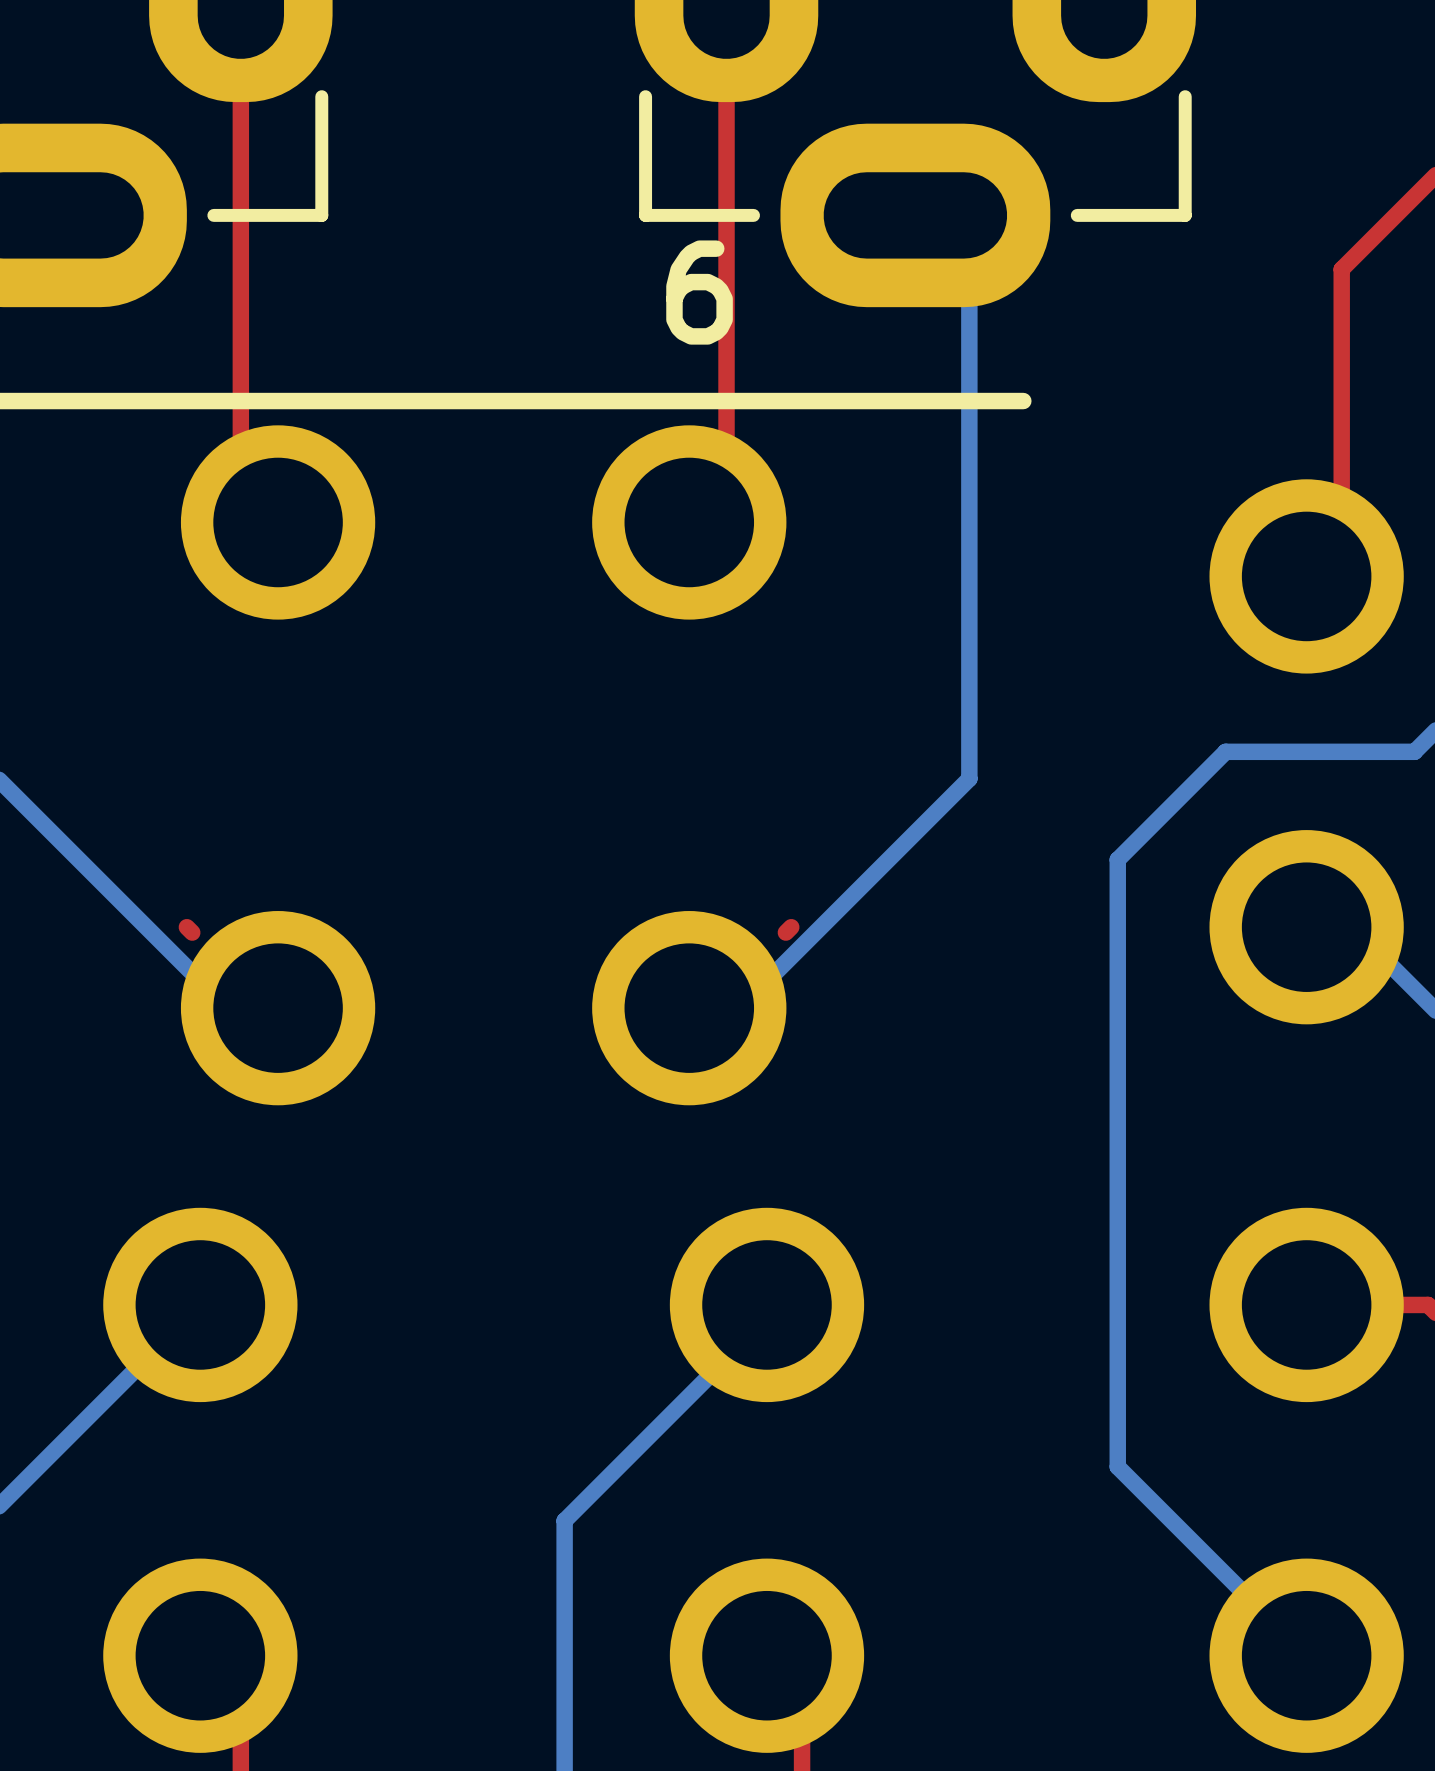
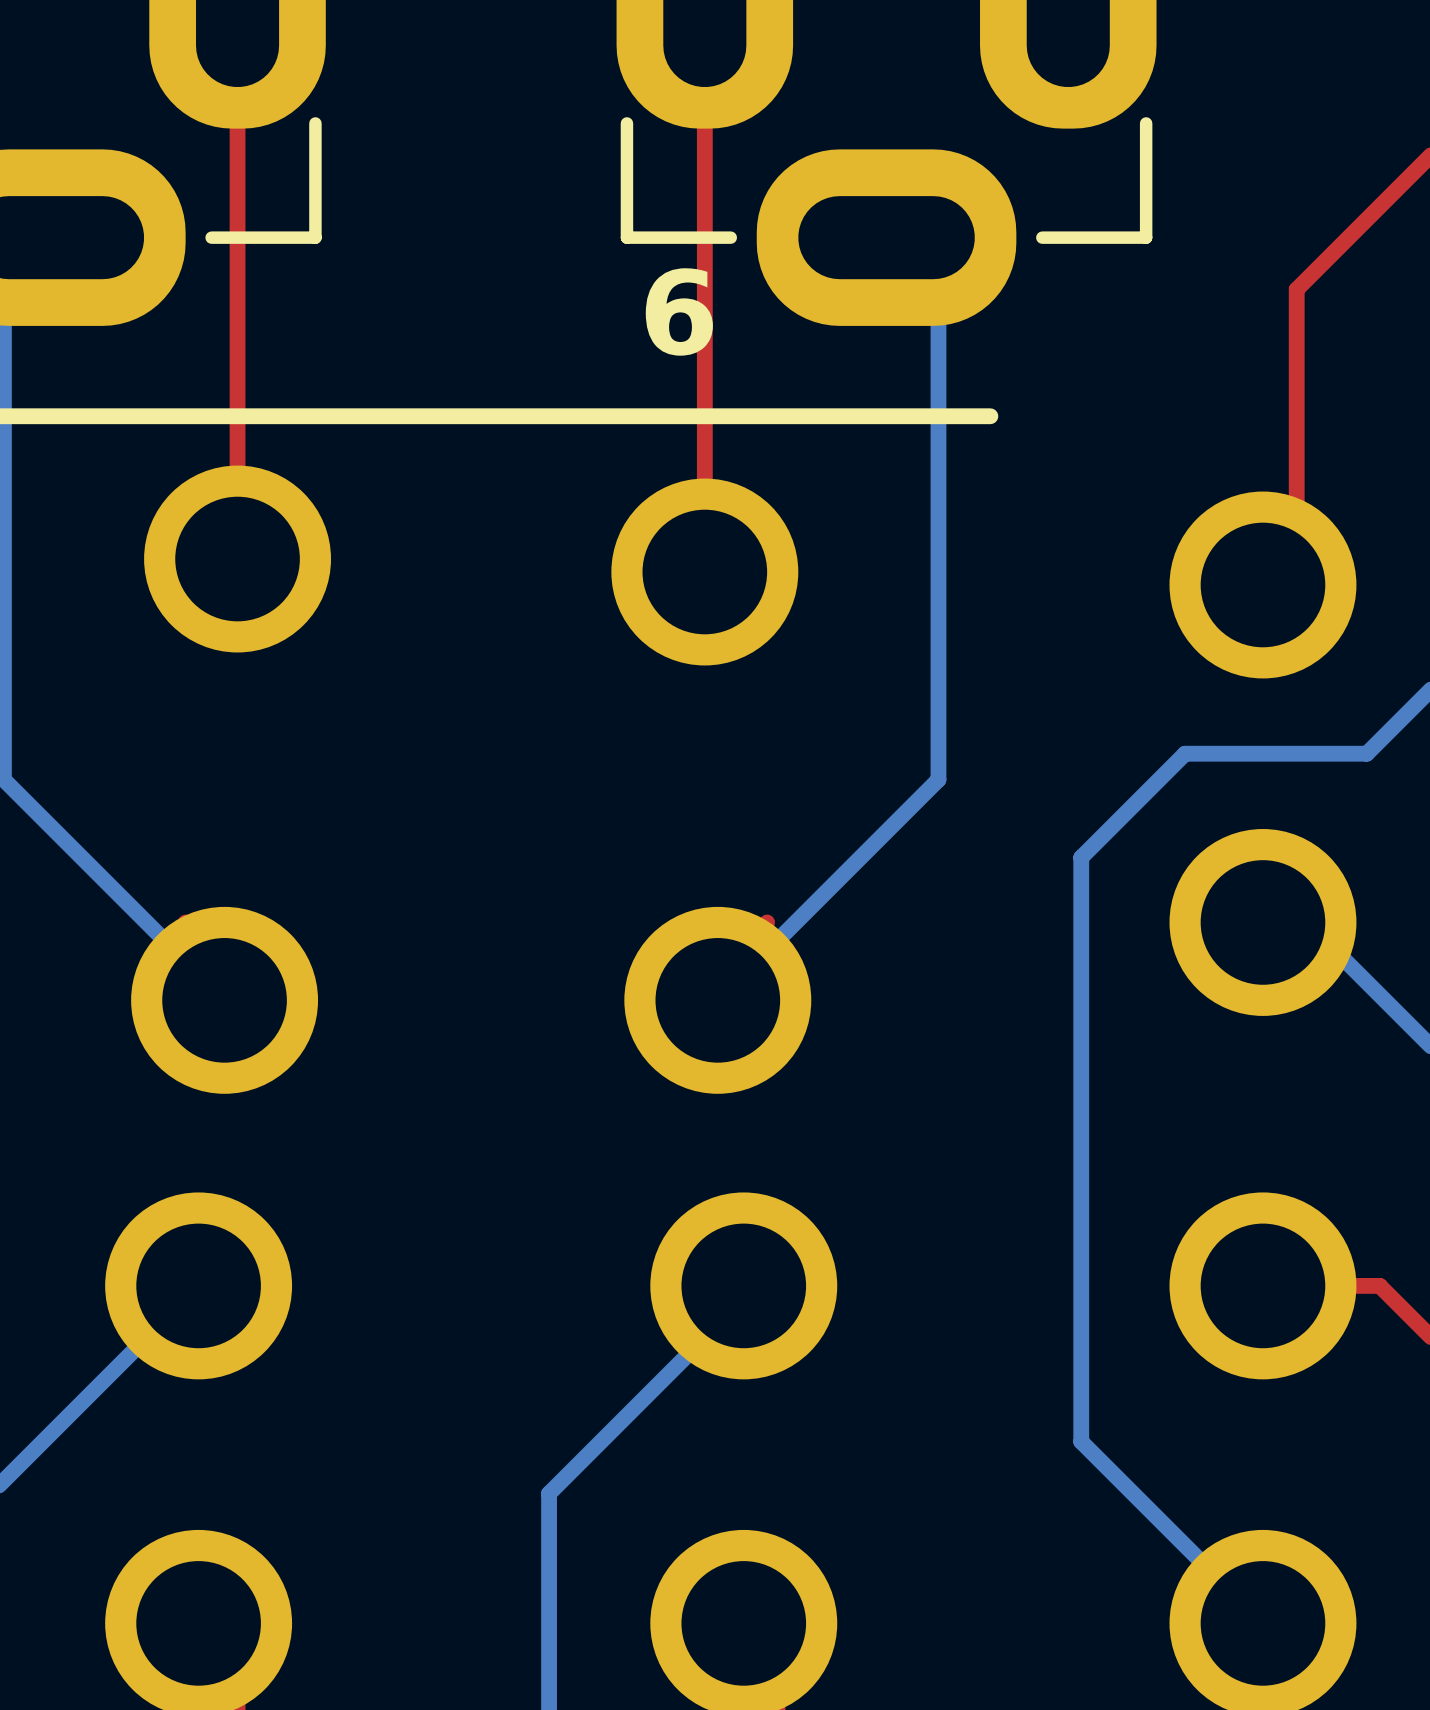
part position: (278, 522) -> (237, 559)
part position: (689, 522) -> (704, 572)
part position: (278, 1008) -> (224, 1000)
part position: (689, 1008) -> (717, 1000)

